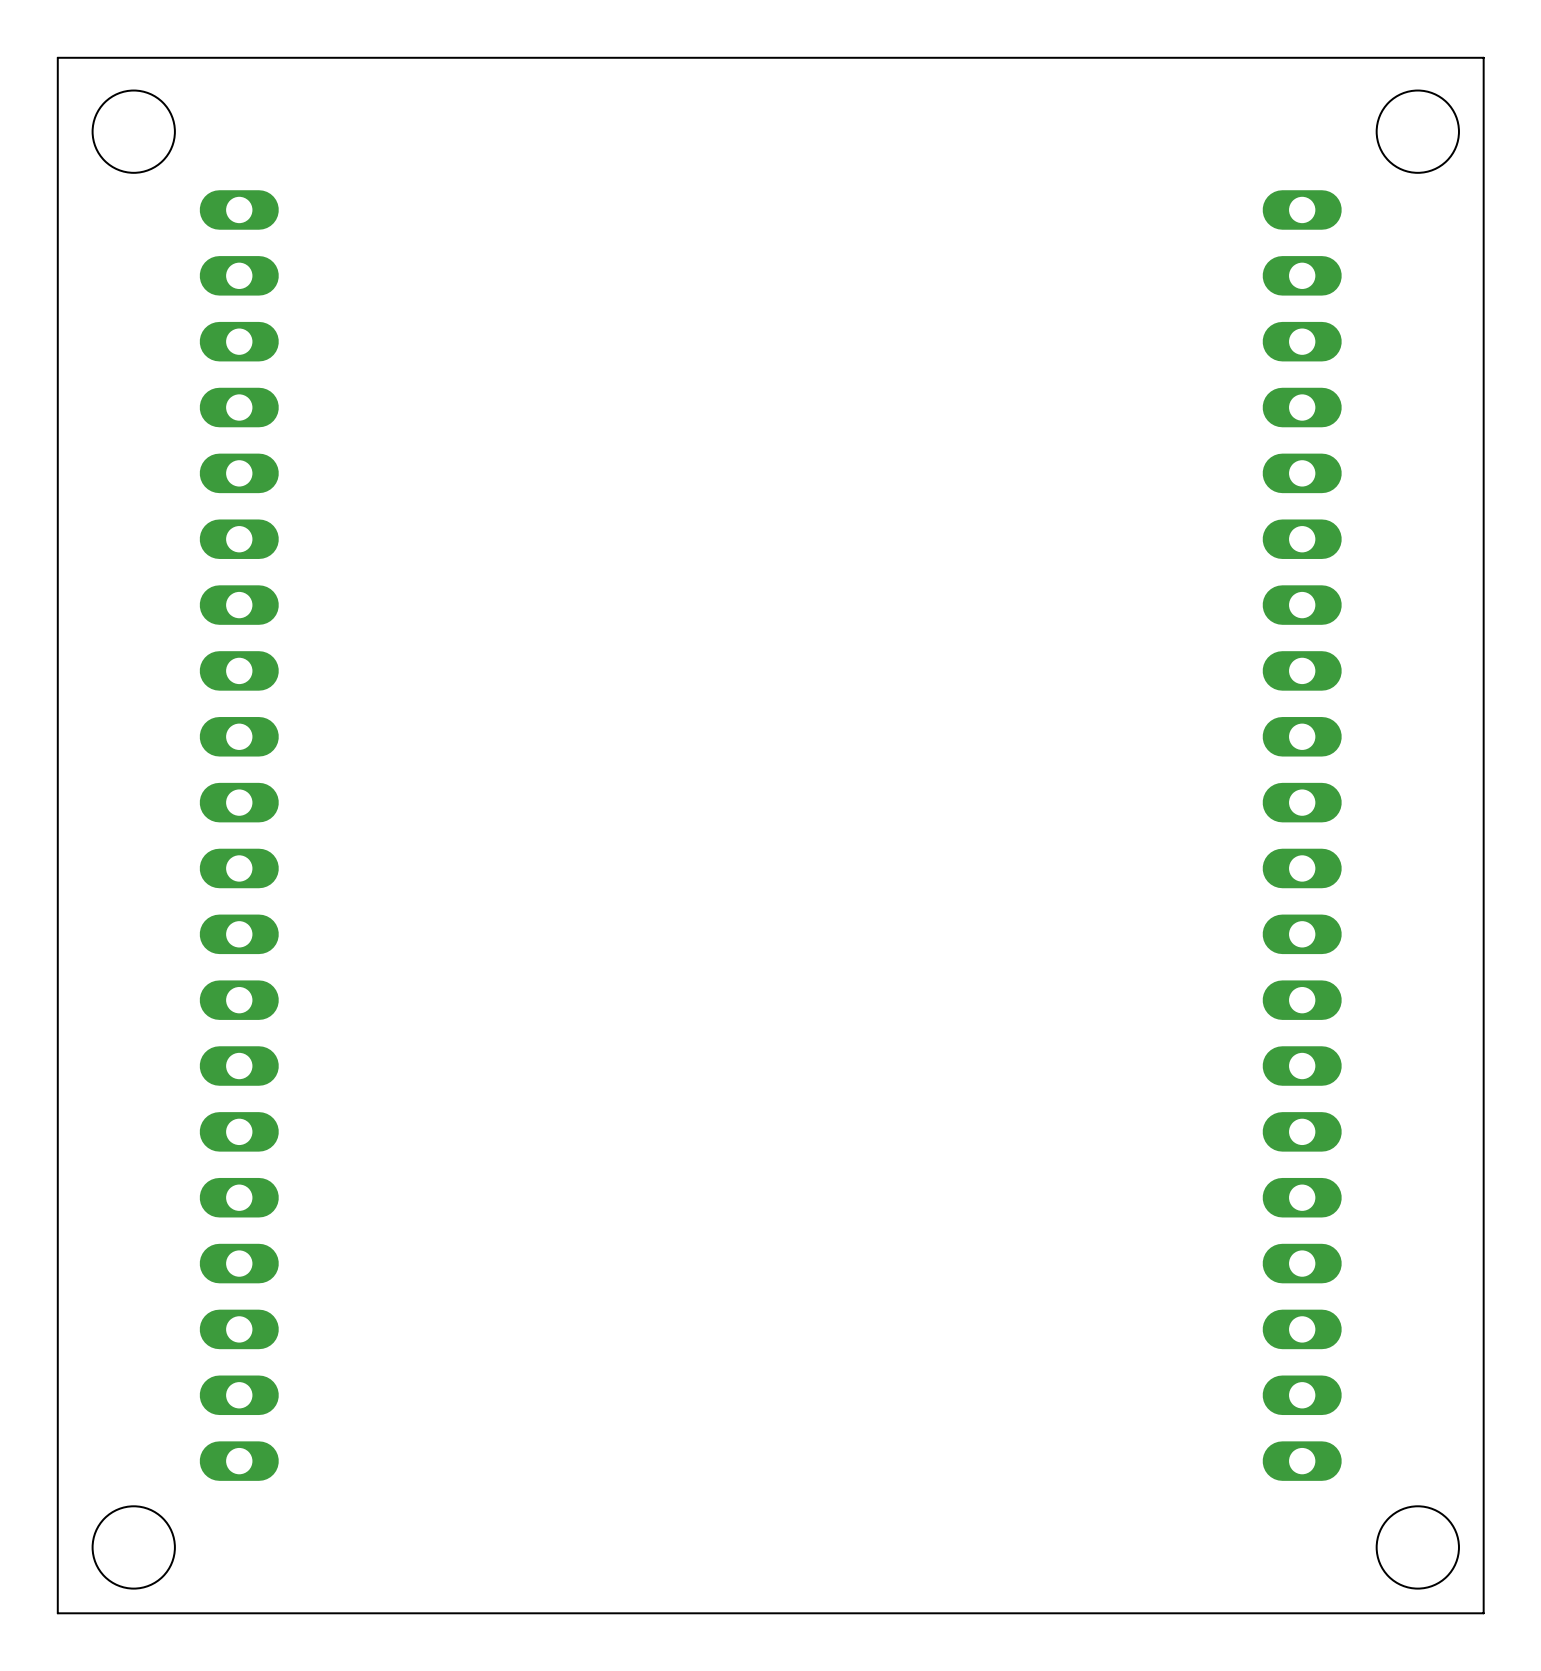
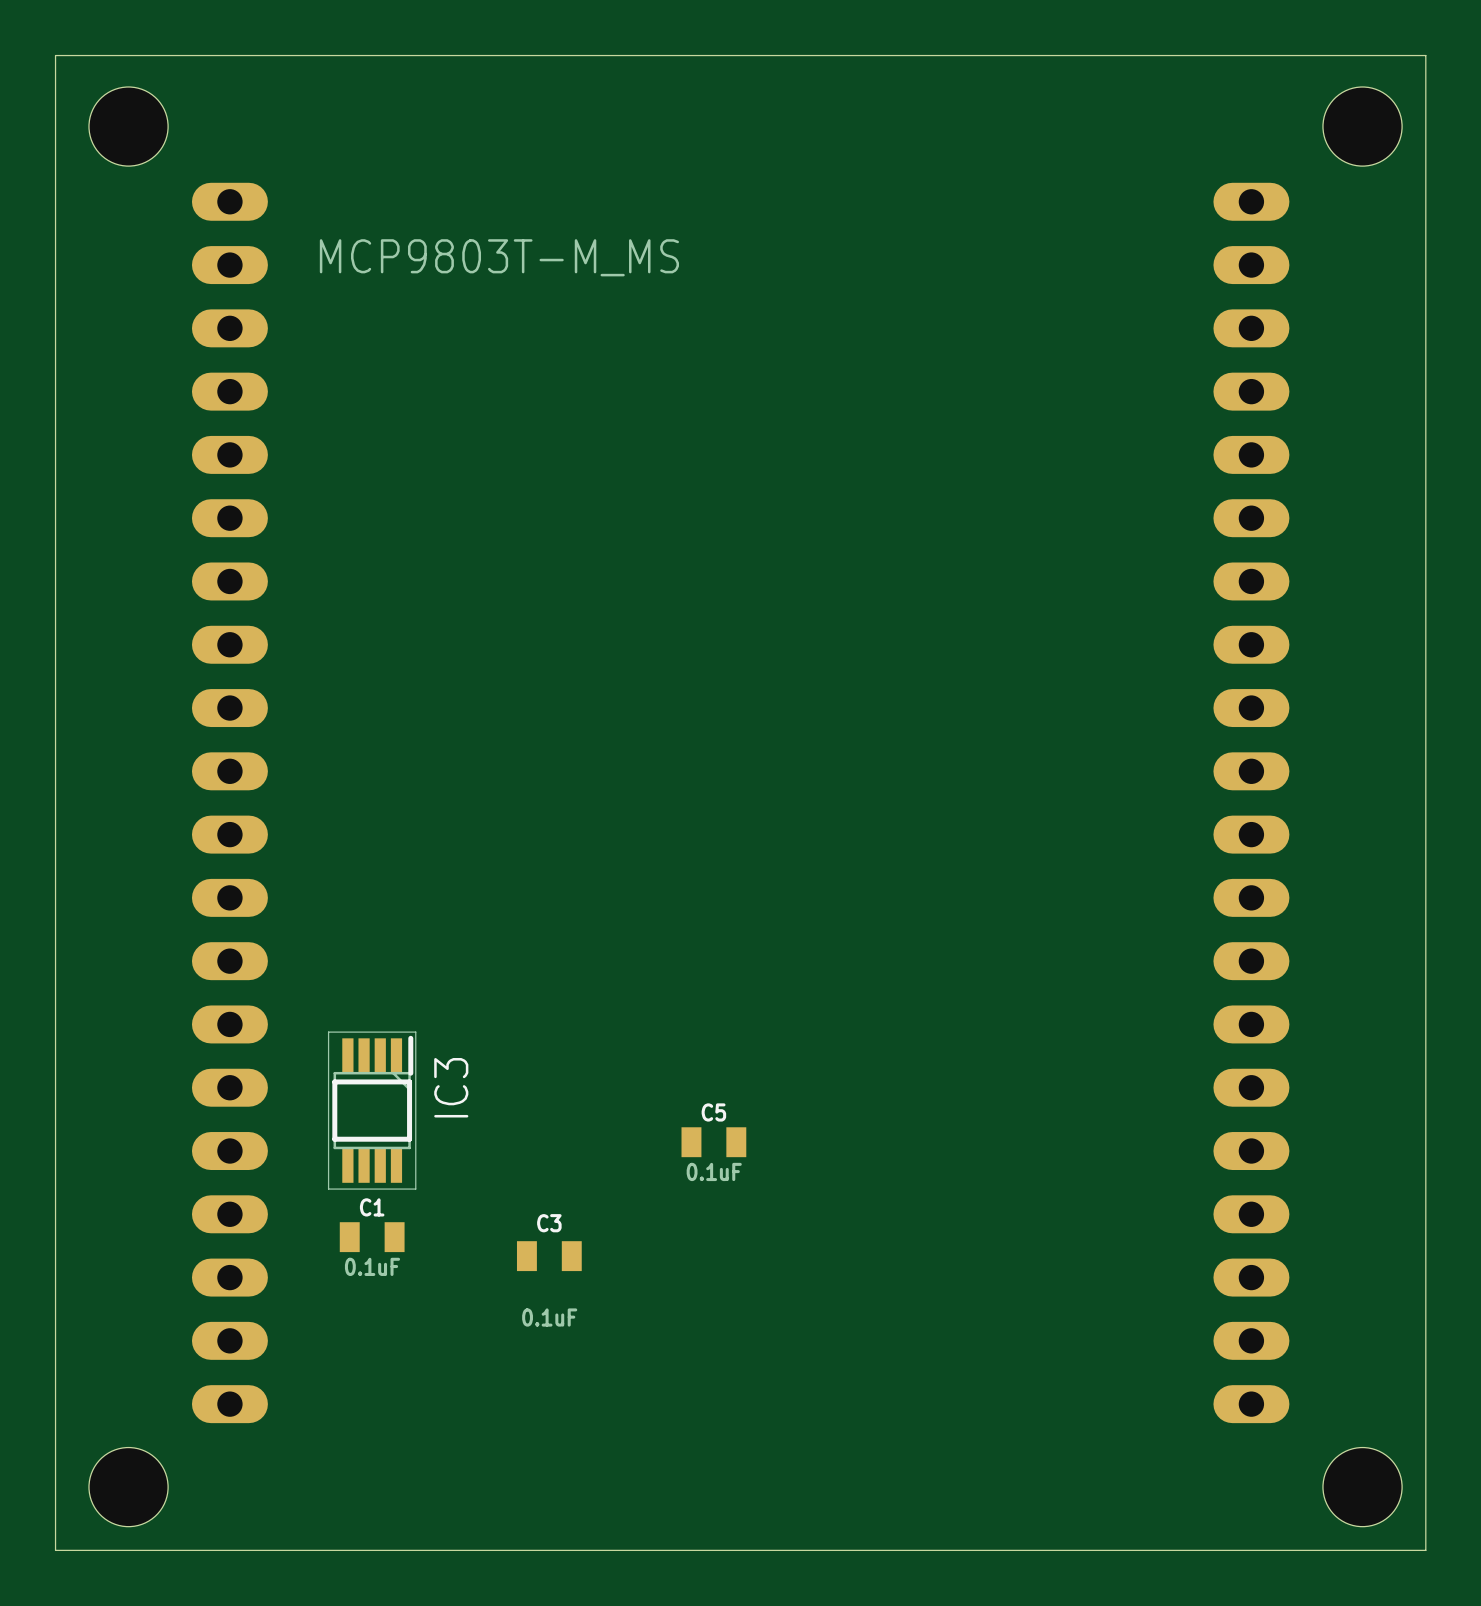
IC3: none -> MCP9803T-M_MS (372, 1110)
C5: none -> 0.1uF (713, 1142)
C1: none -> 0.1uF (372, 1237)
C3: none -> 0.1uF (549, 1256)

